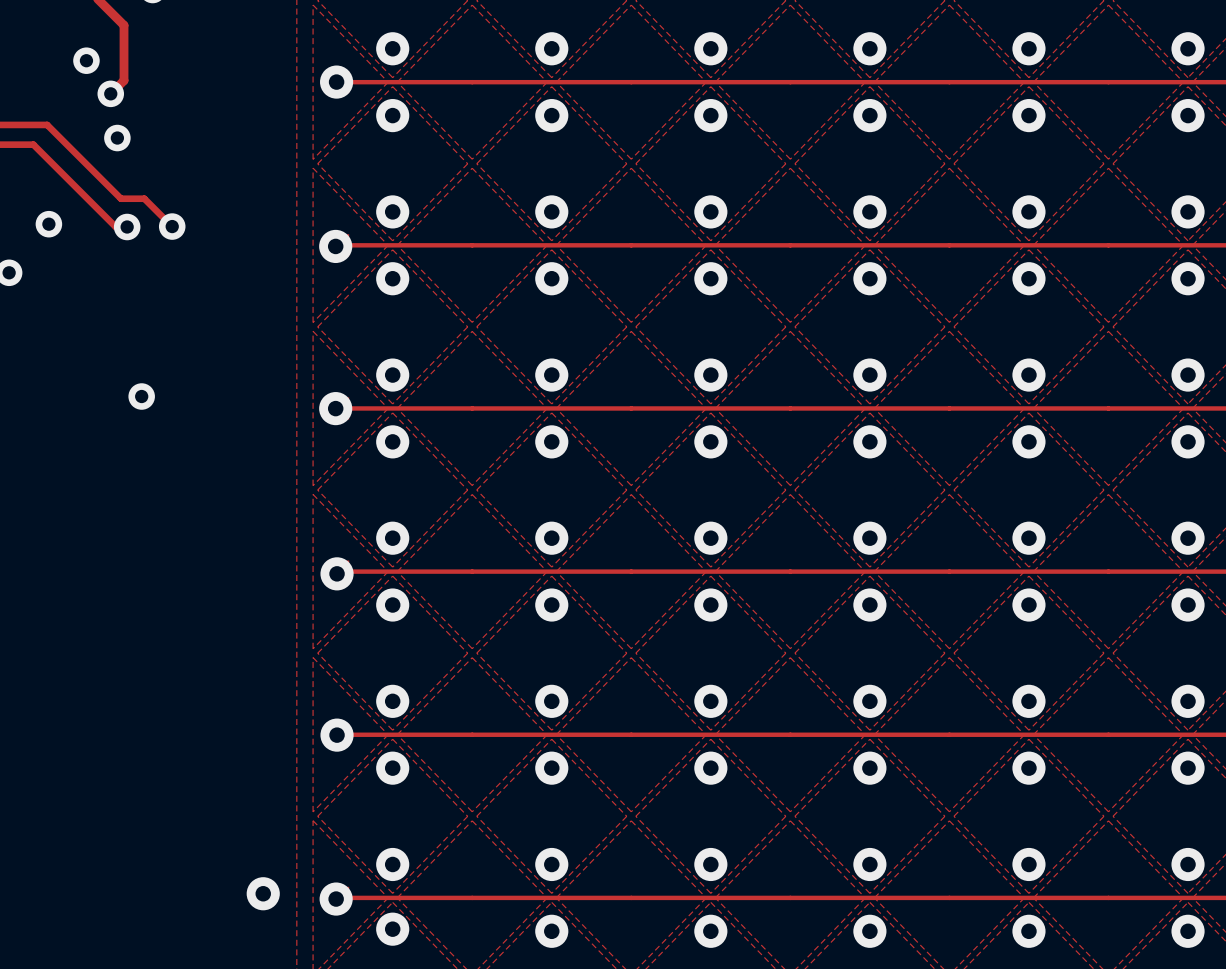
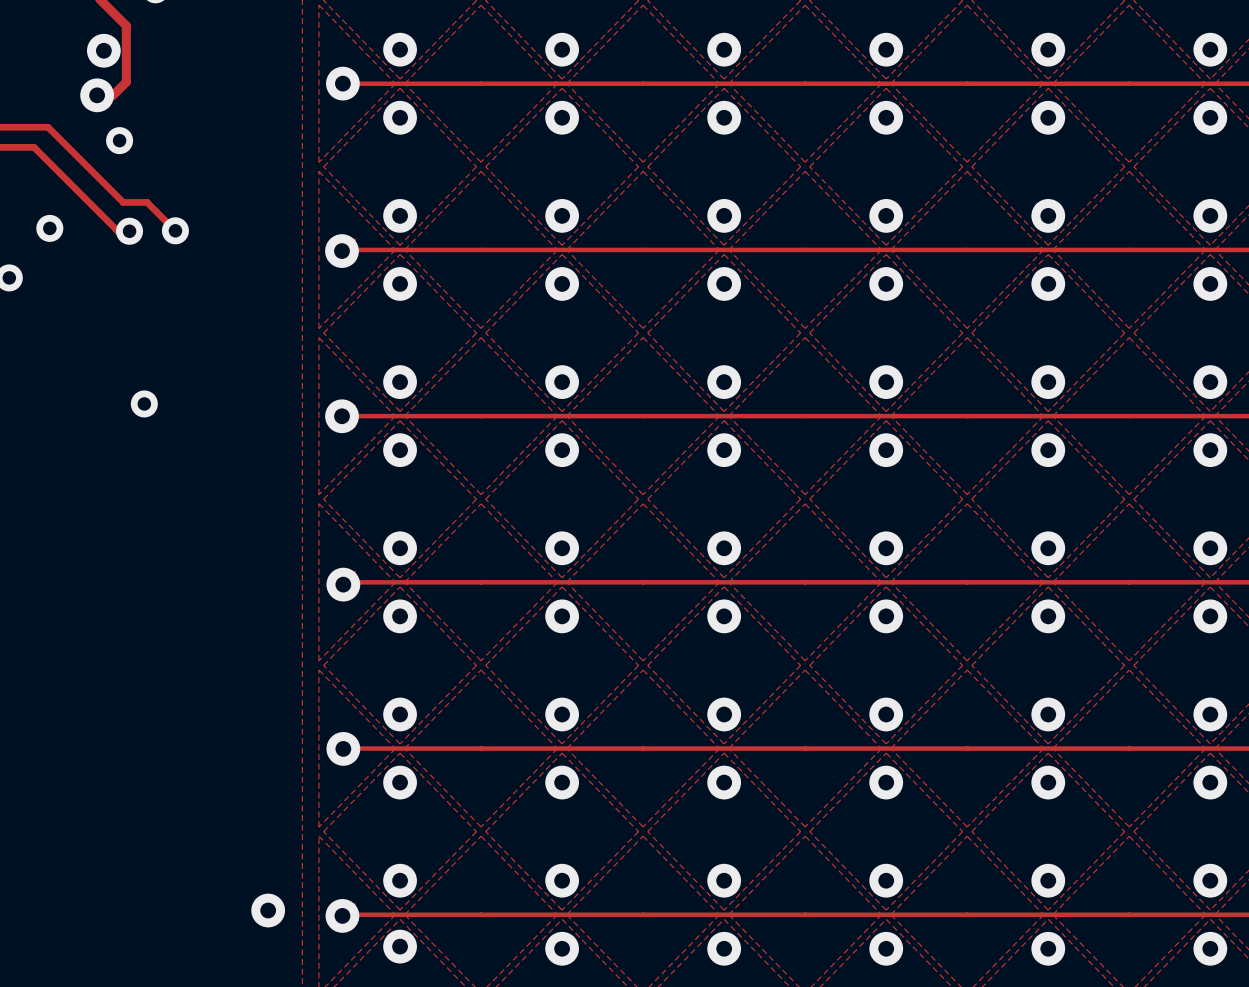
via position: (86, 60) -> (103, 50)
via position: (110, 93) -> (97, 95)

